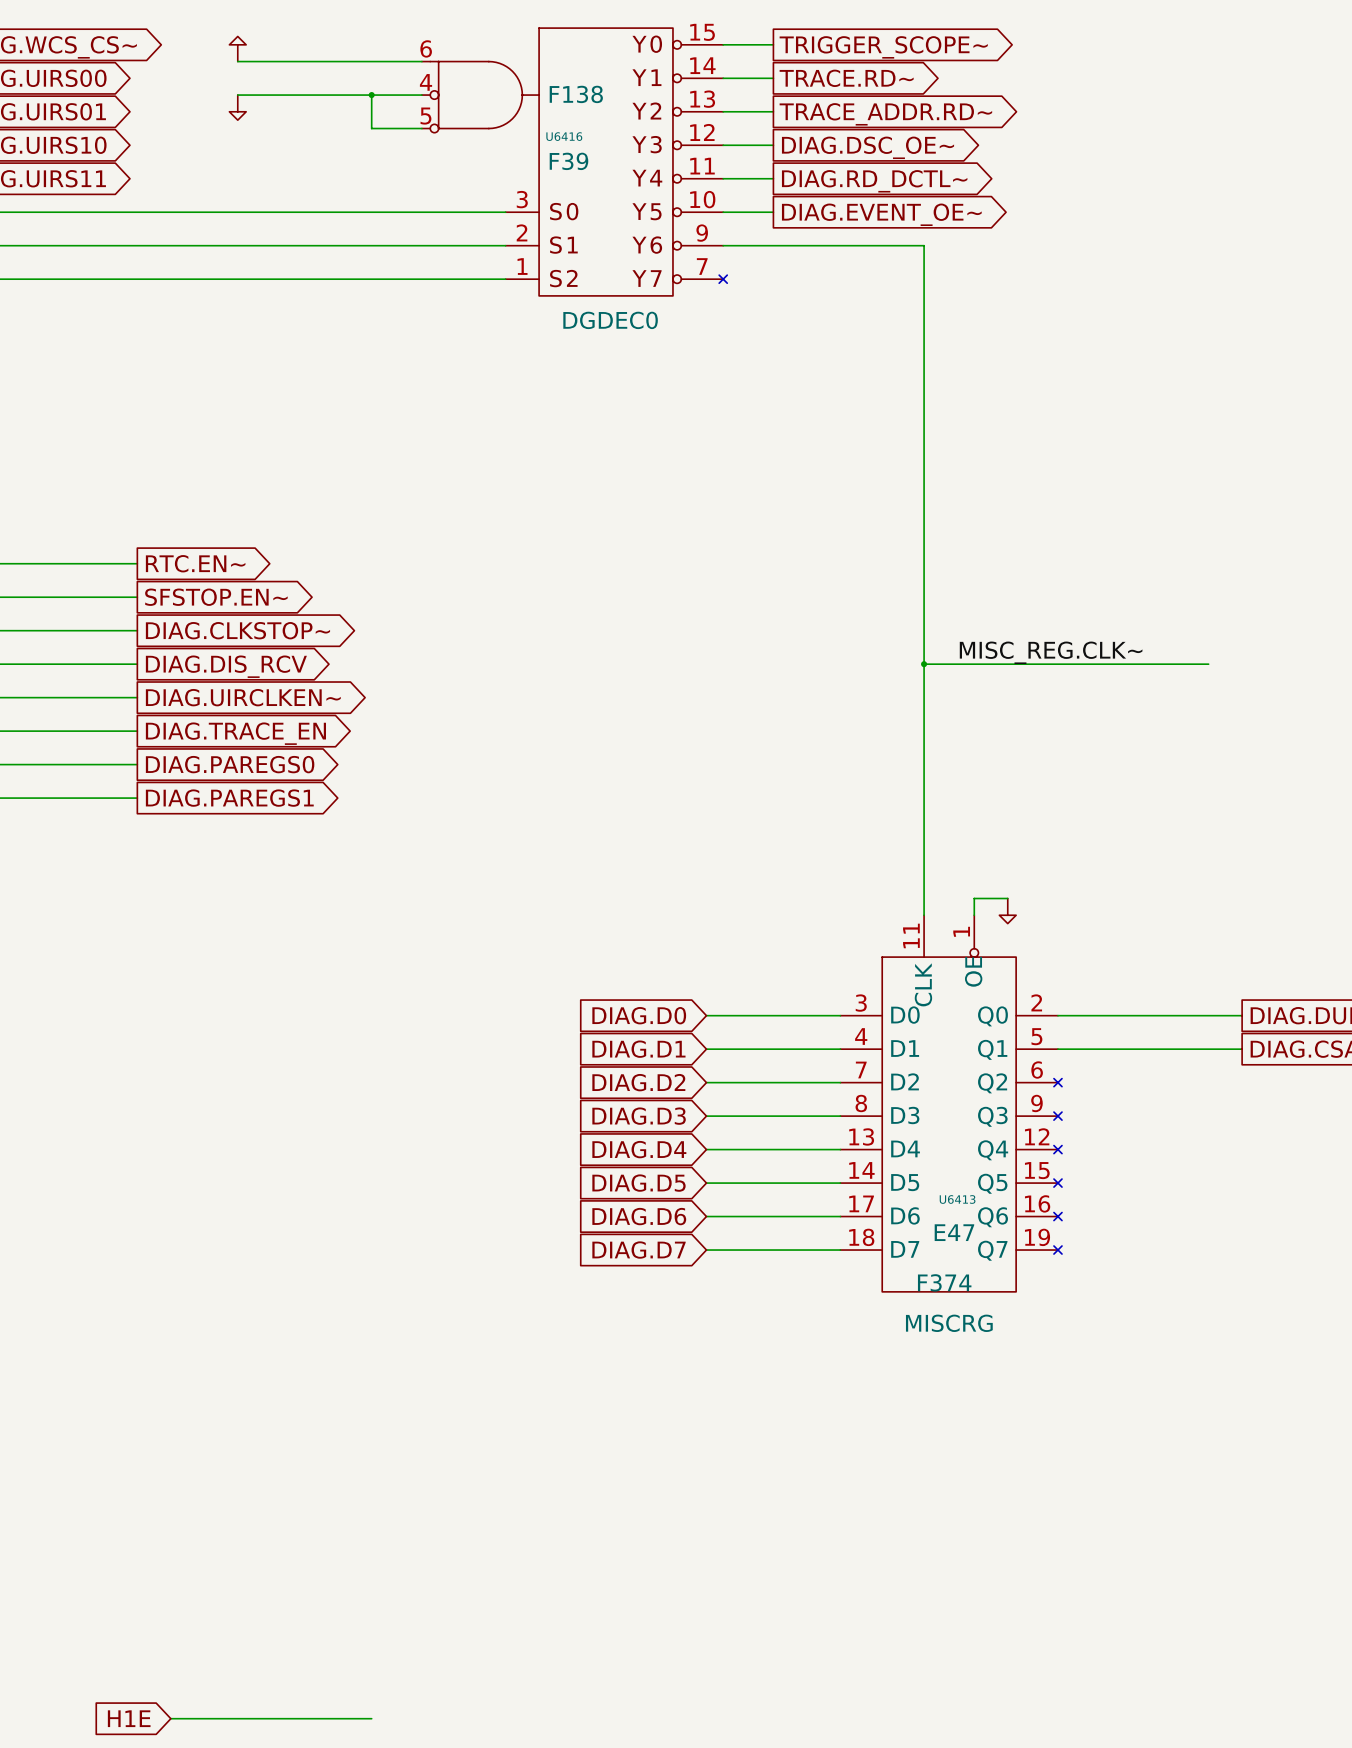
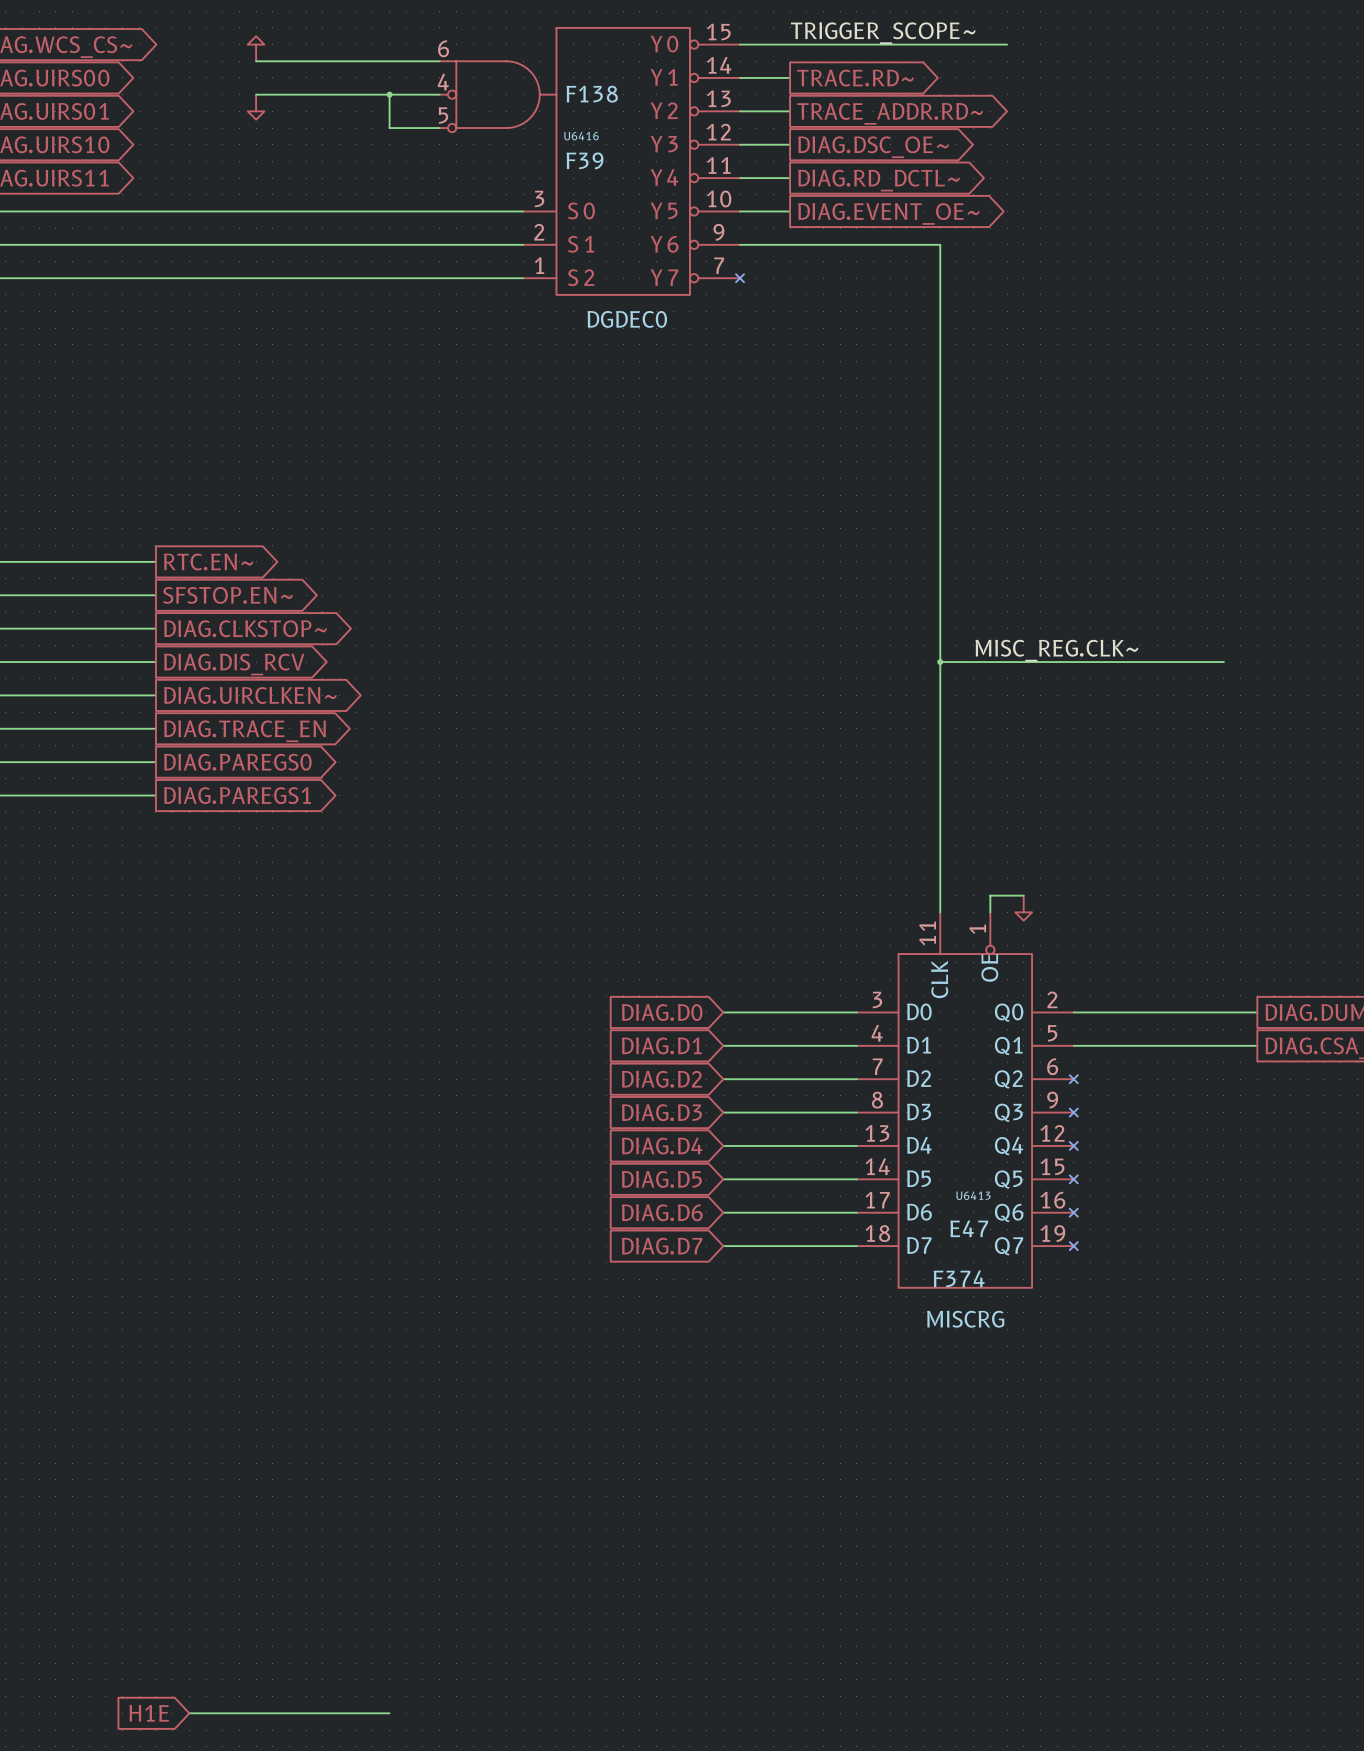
label: none -> TRIGGER_SCOPE~ (883, 33)
wire: none -> (790, 44) (1007, 44)
global label: TRIGGER_SCOPE~ (883, 47) -> none

